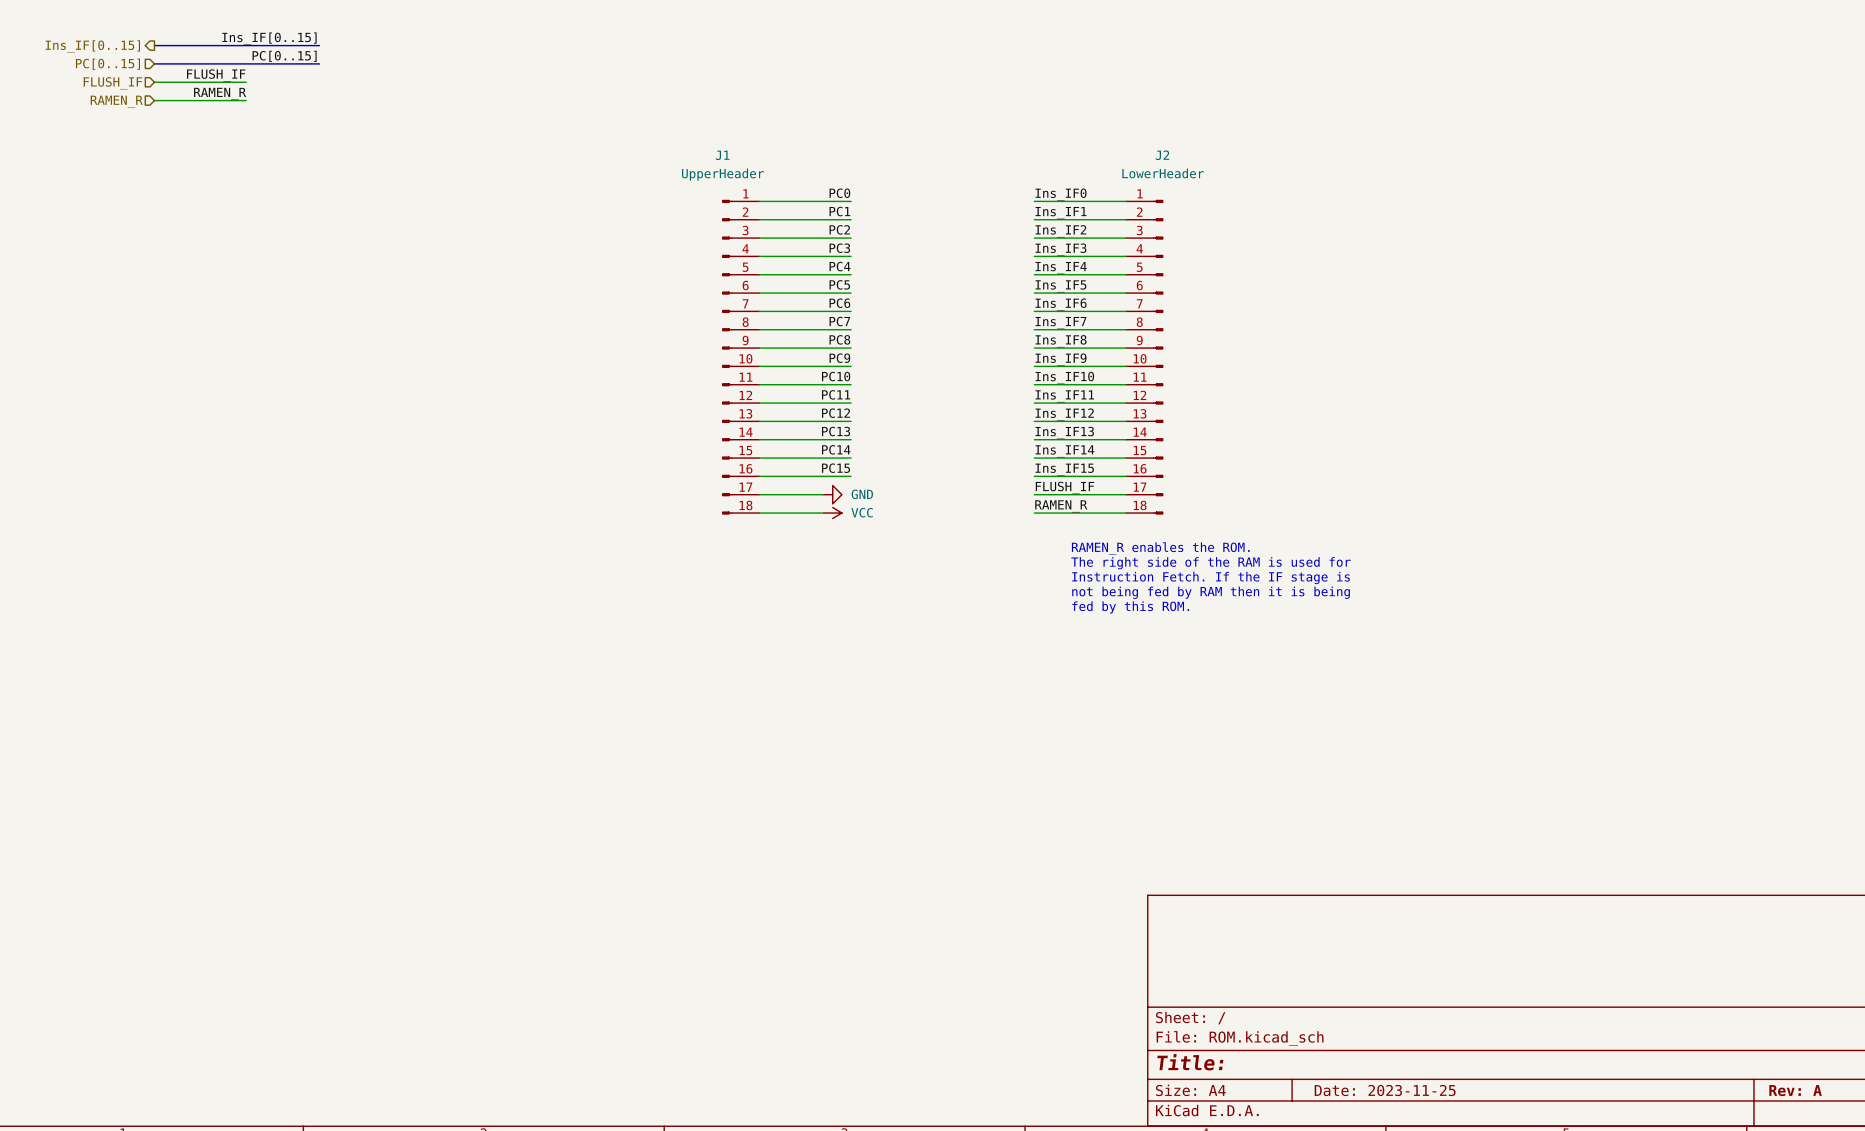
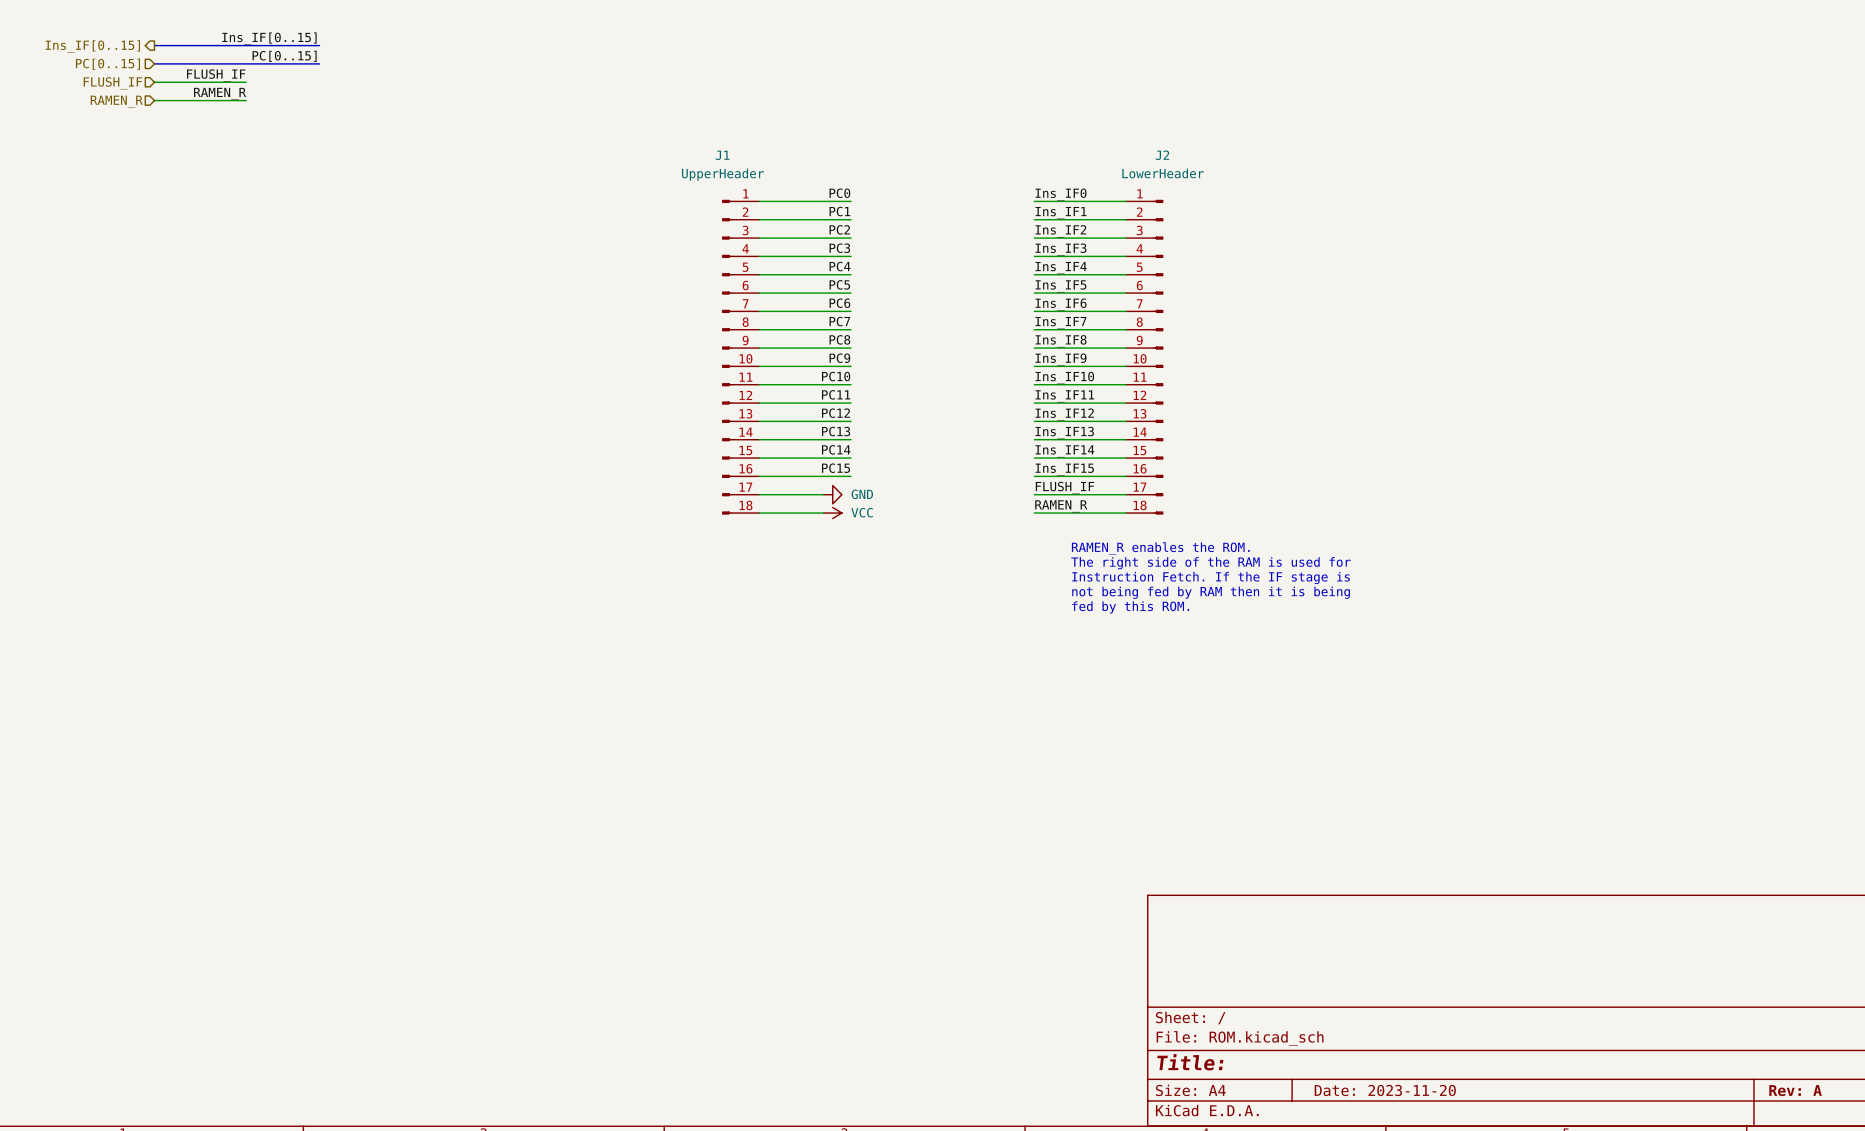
title block: Date: 2023-11-25 (1385, 1090) -> Date: 2023-11-20 (1385, 1090)

